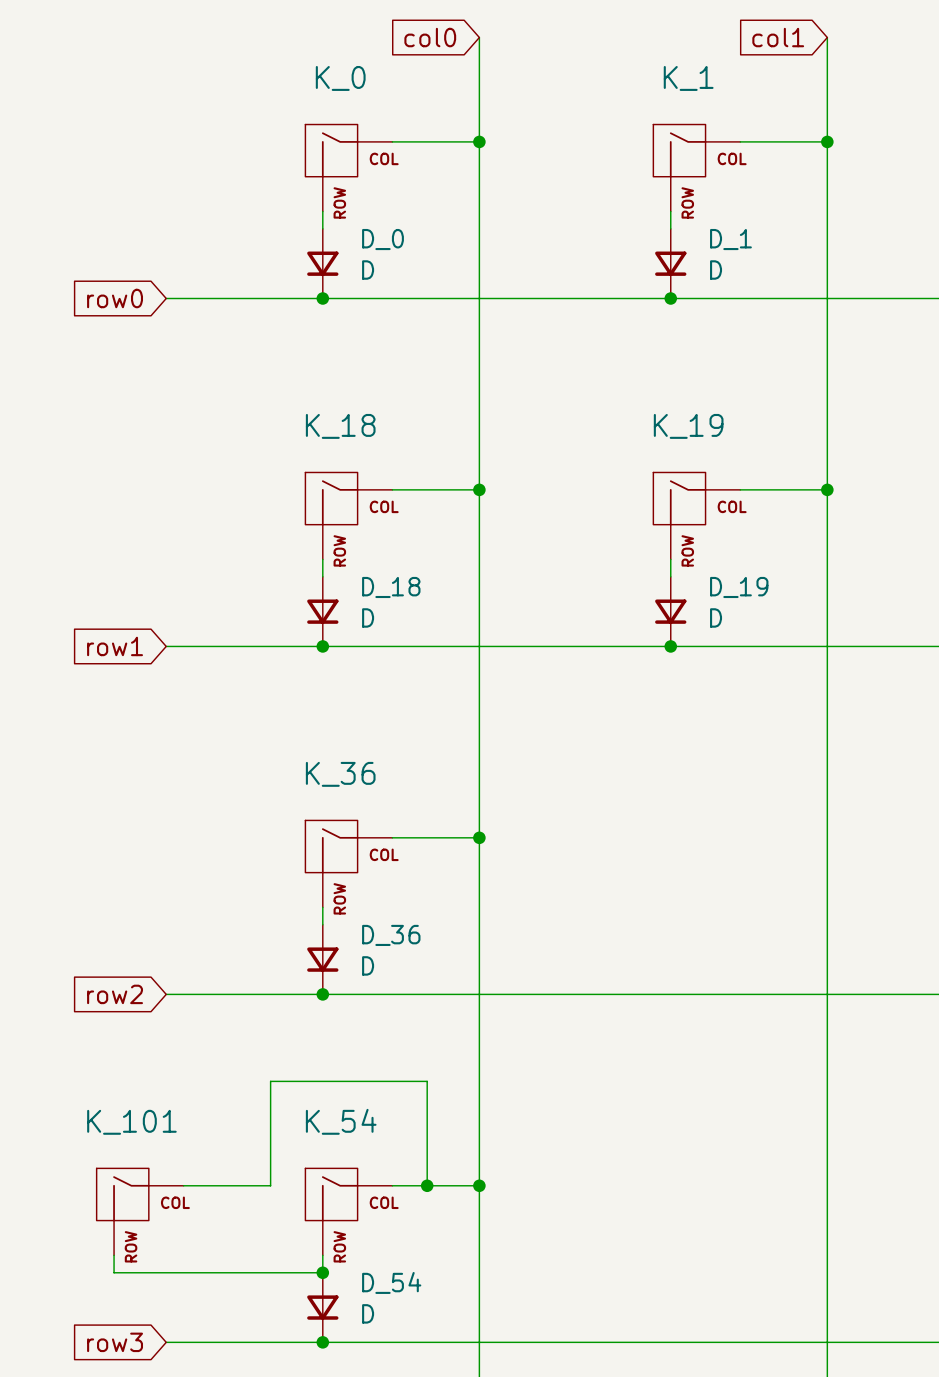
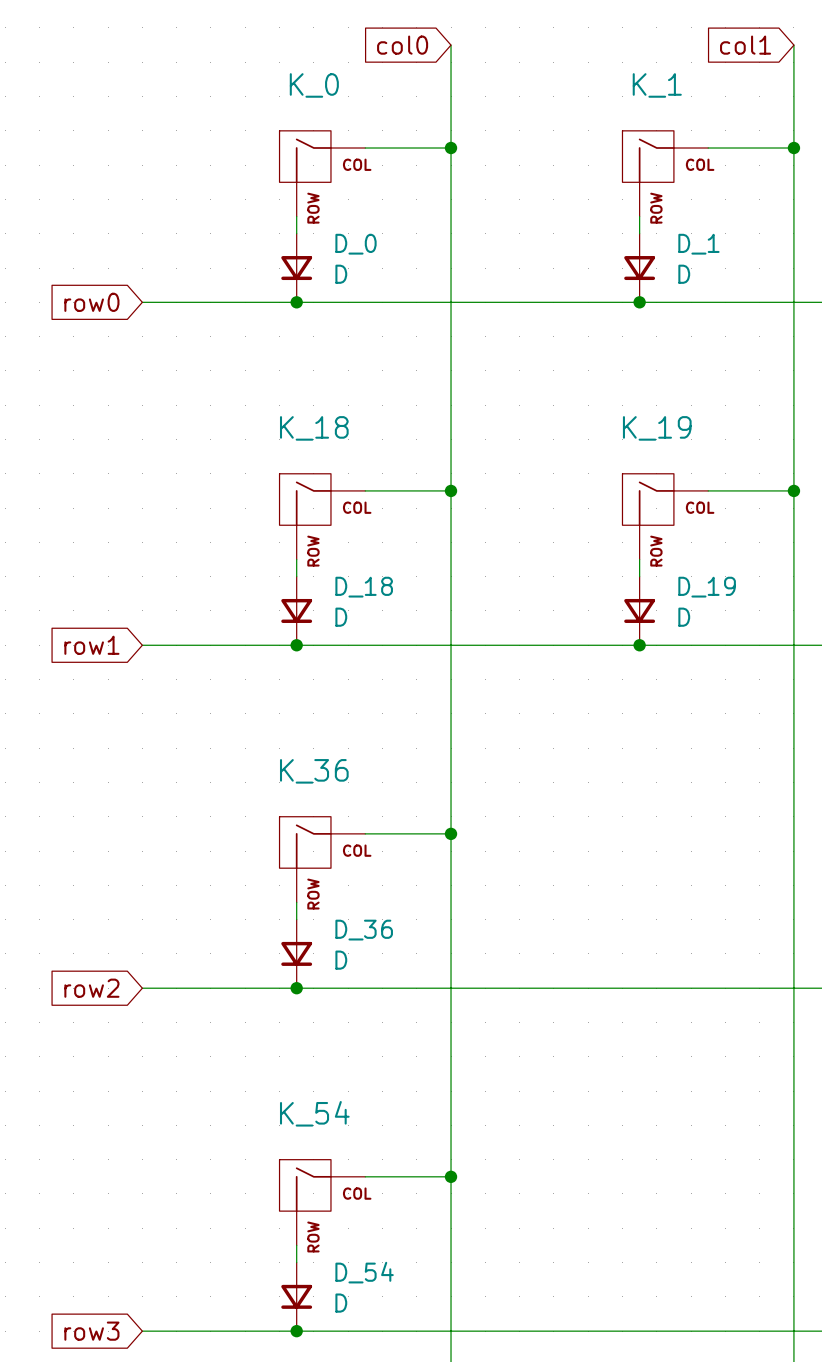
wire: (183, 1185) (270, 1185) (270, 1081) (427, 1081) (427, 1185) -> none
junction: (427, 1185) -> none
K_101: (140, 1211) -> none
wire: (114, 1255) (114, 1272) (322, 1272) -> none
junction: (322, 1272) -> none

